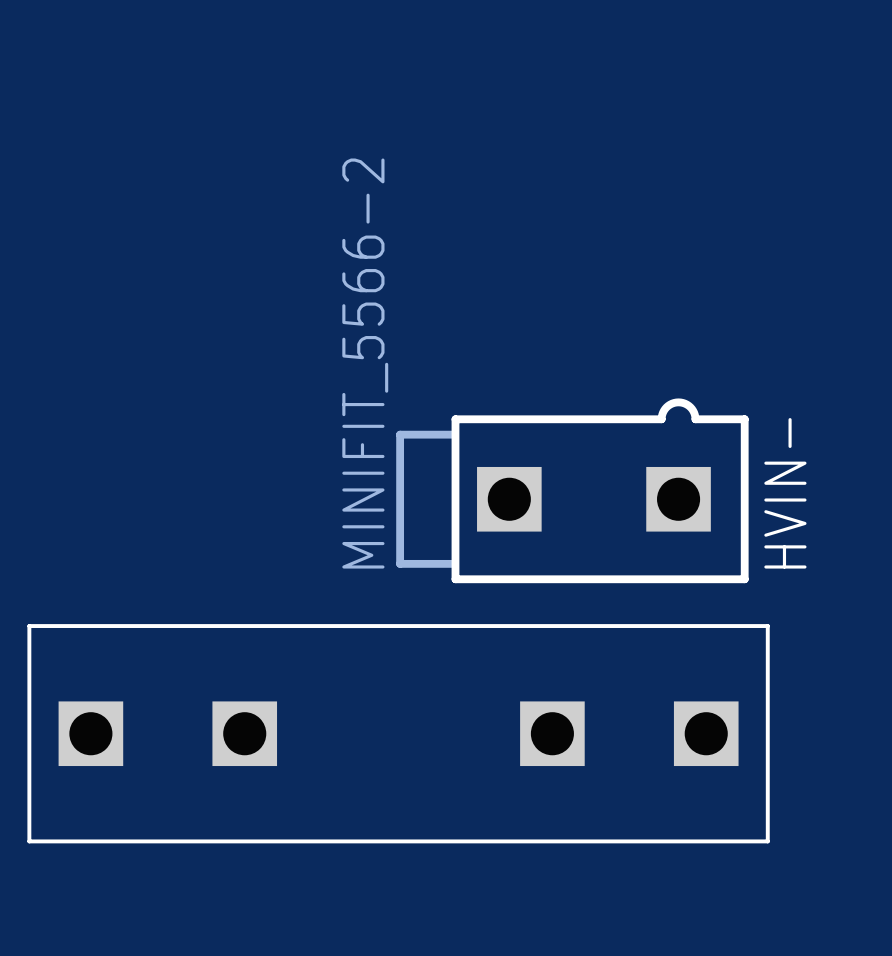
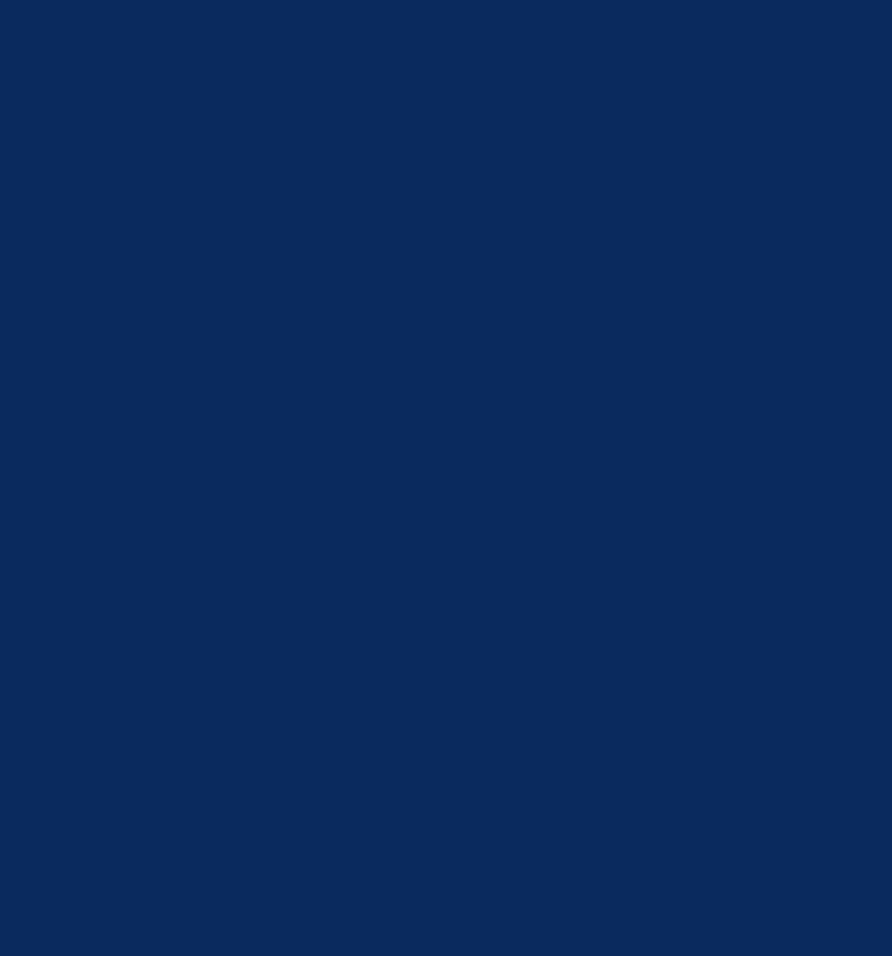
HVIN-: MINIFIT_5566-2 (572, 490) -> none
part: (398, 733) -> none

